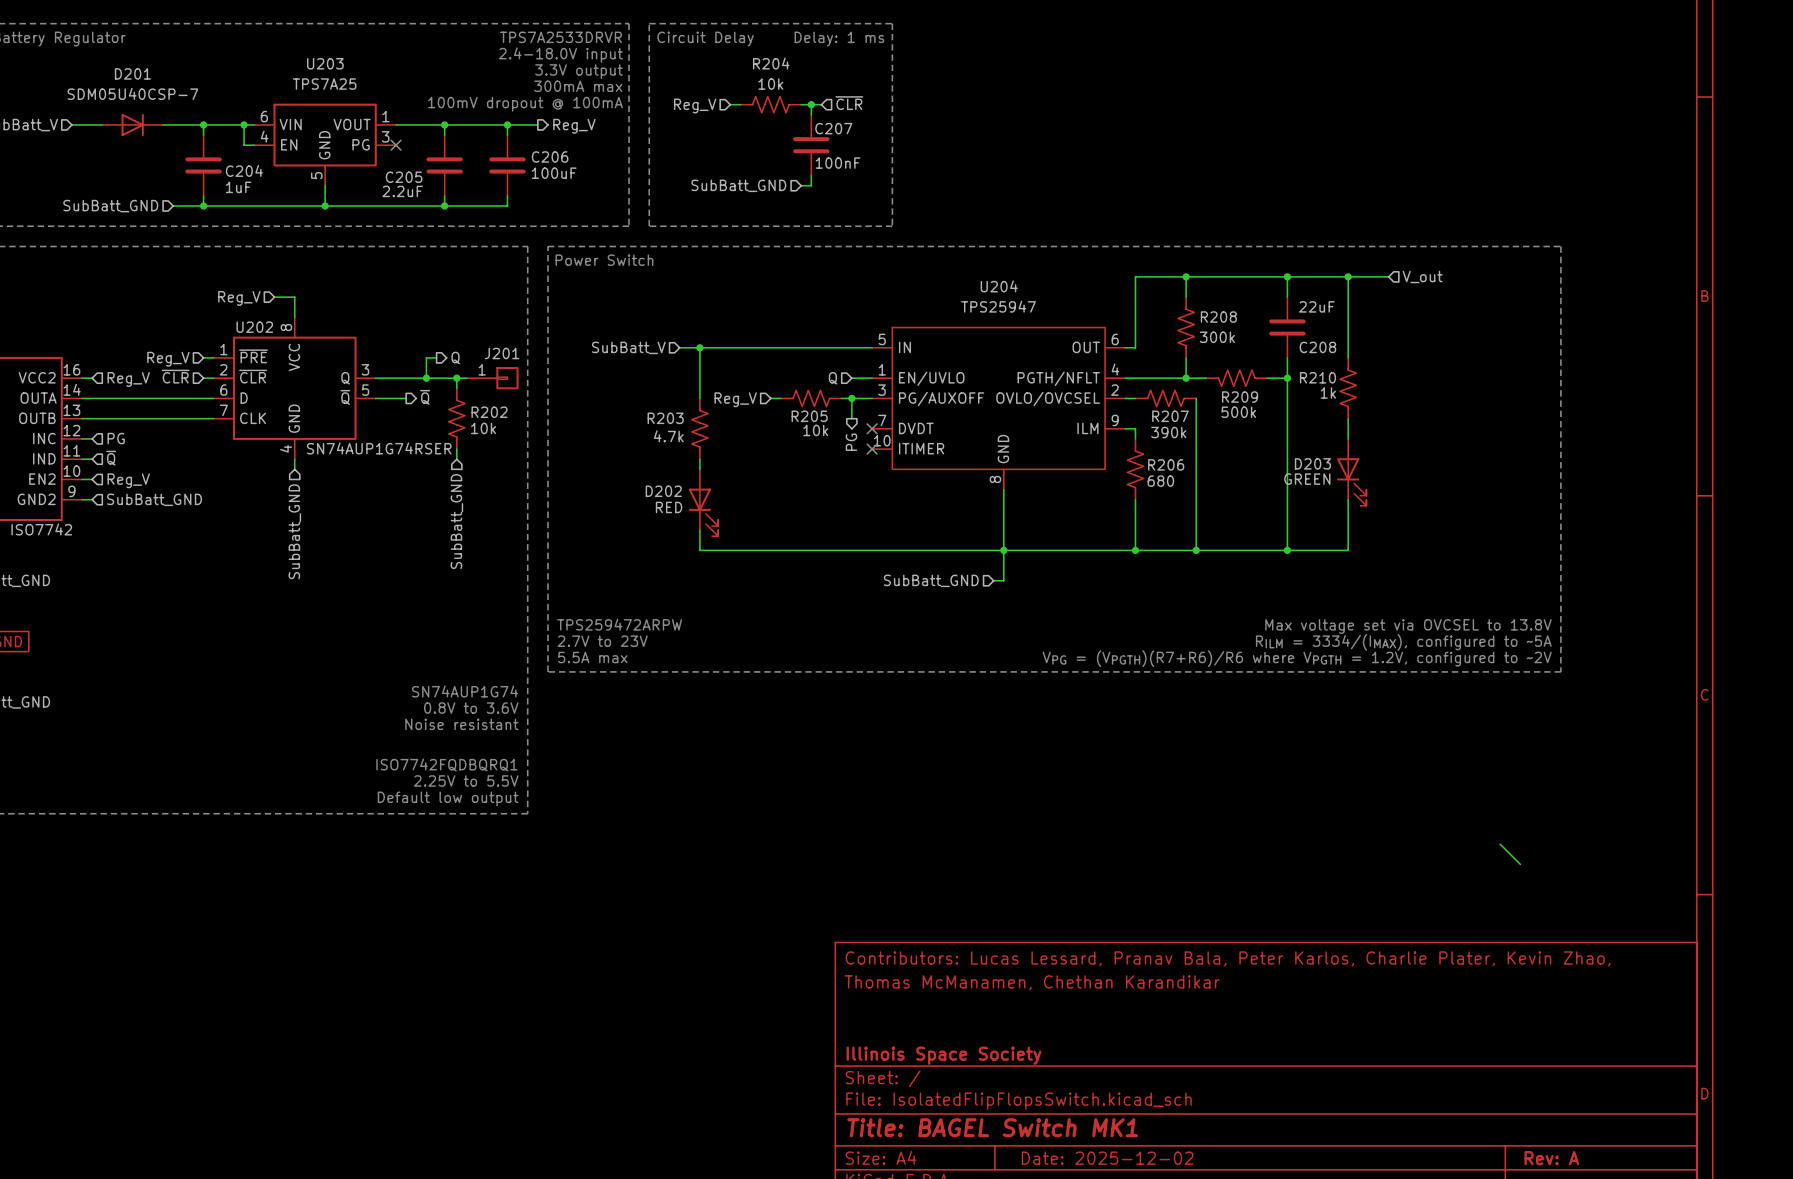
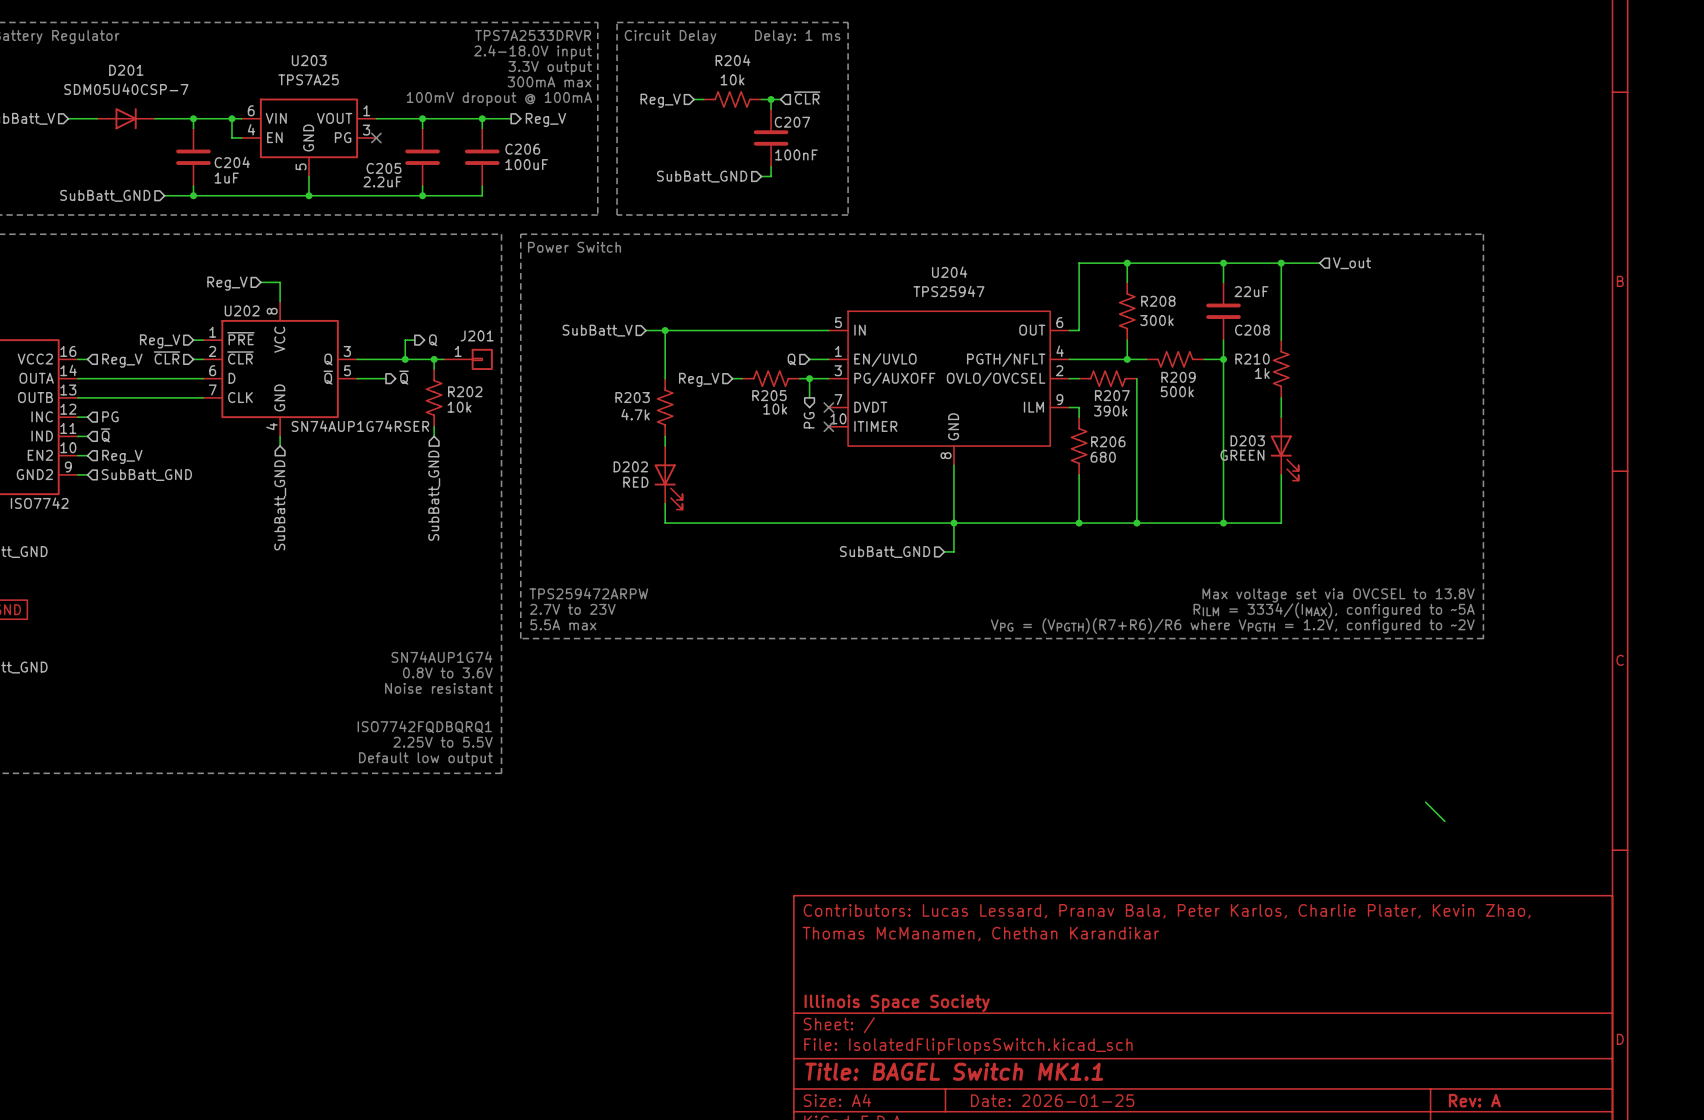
title block: Title: BAGEL Switch MK1 (992, 1127) -> Title: BAGEL Switch MK1.1 (954, 1071)
title block: Date: 2025-12-02 (1107, 1158) -> Date: 2026-01-25 (1052, 1100)

